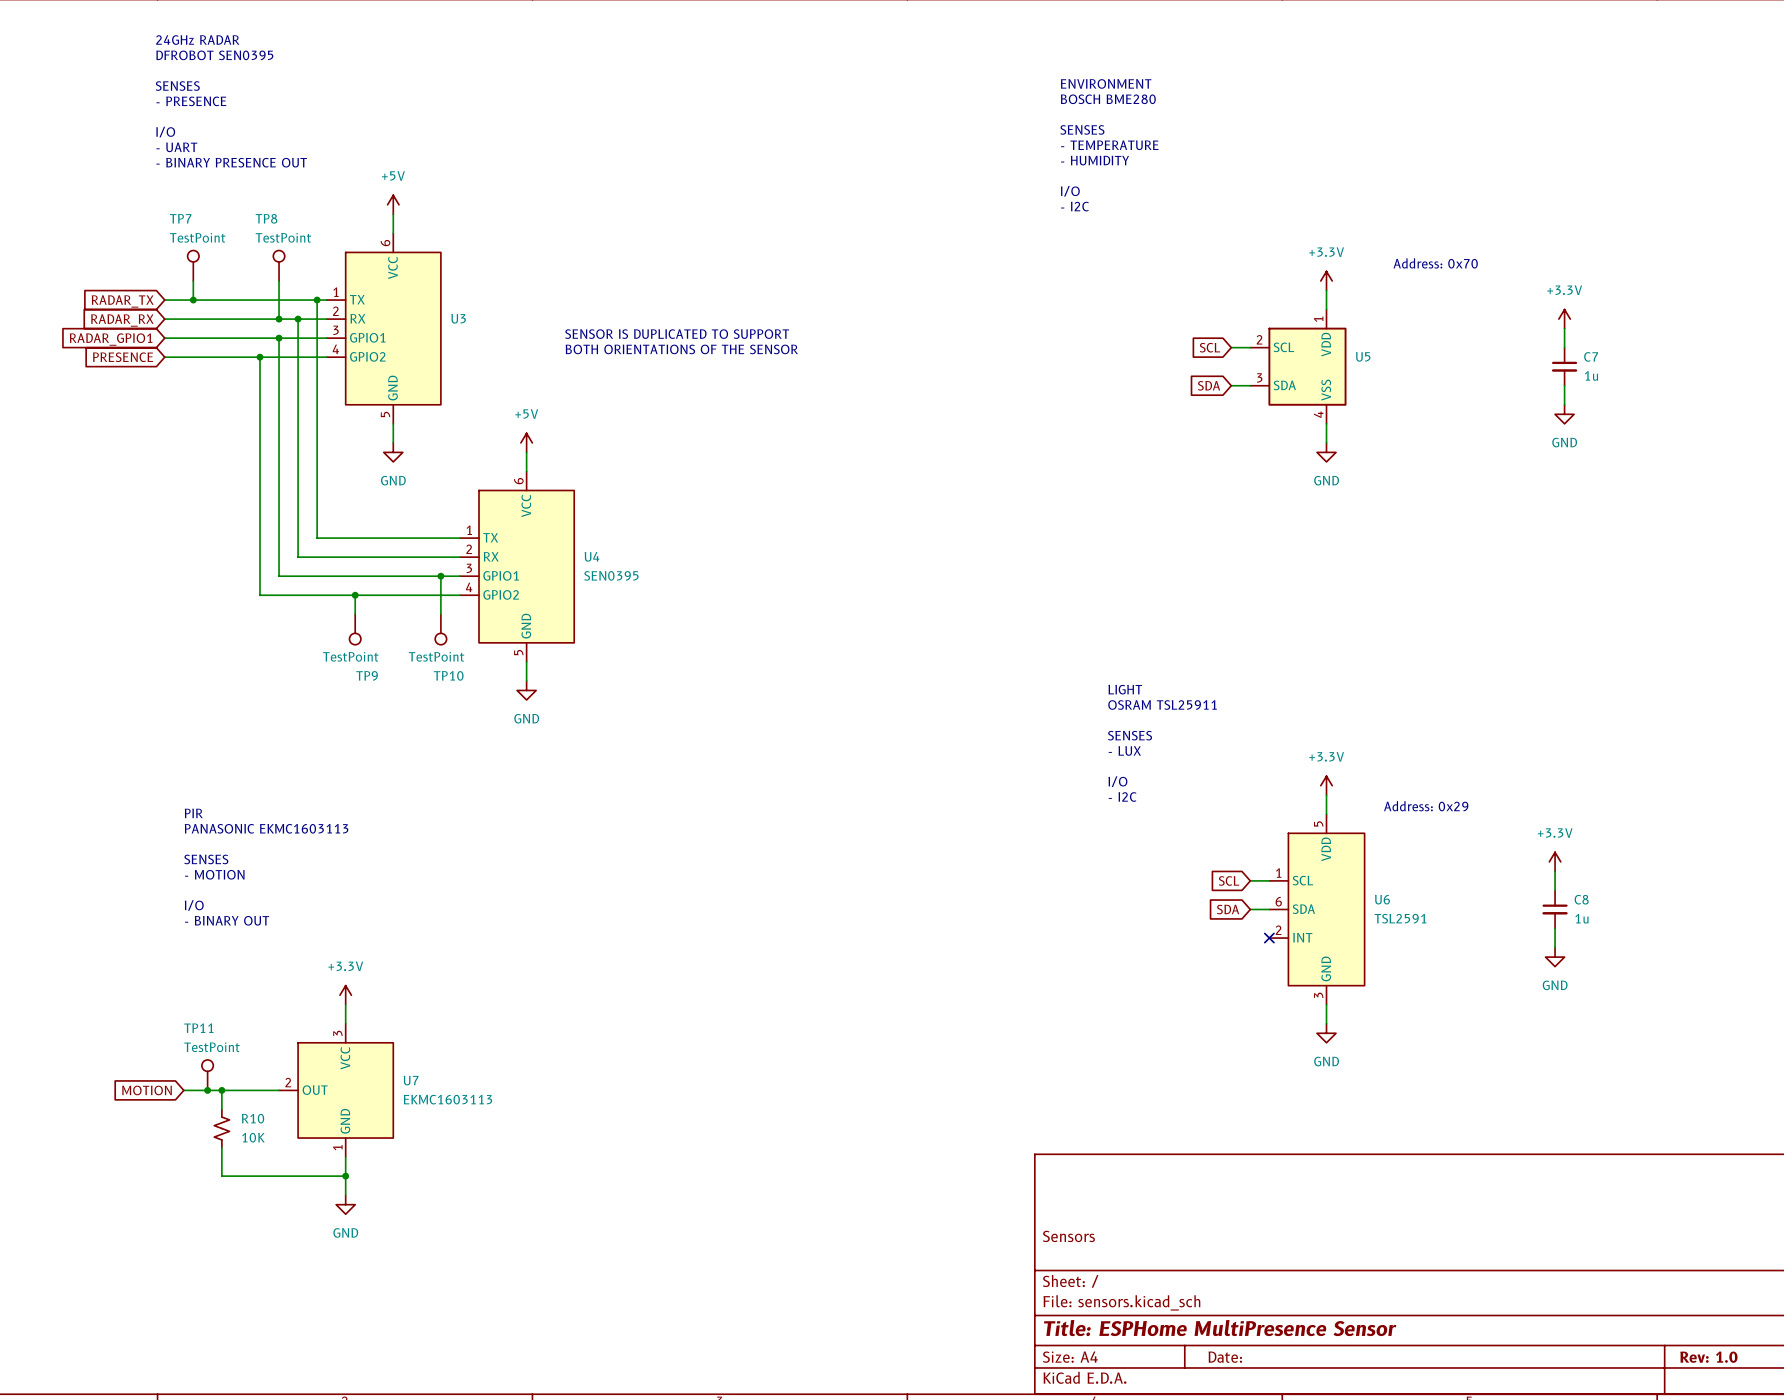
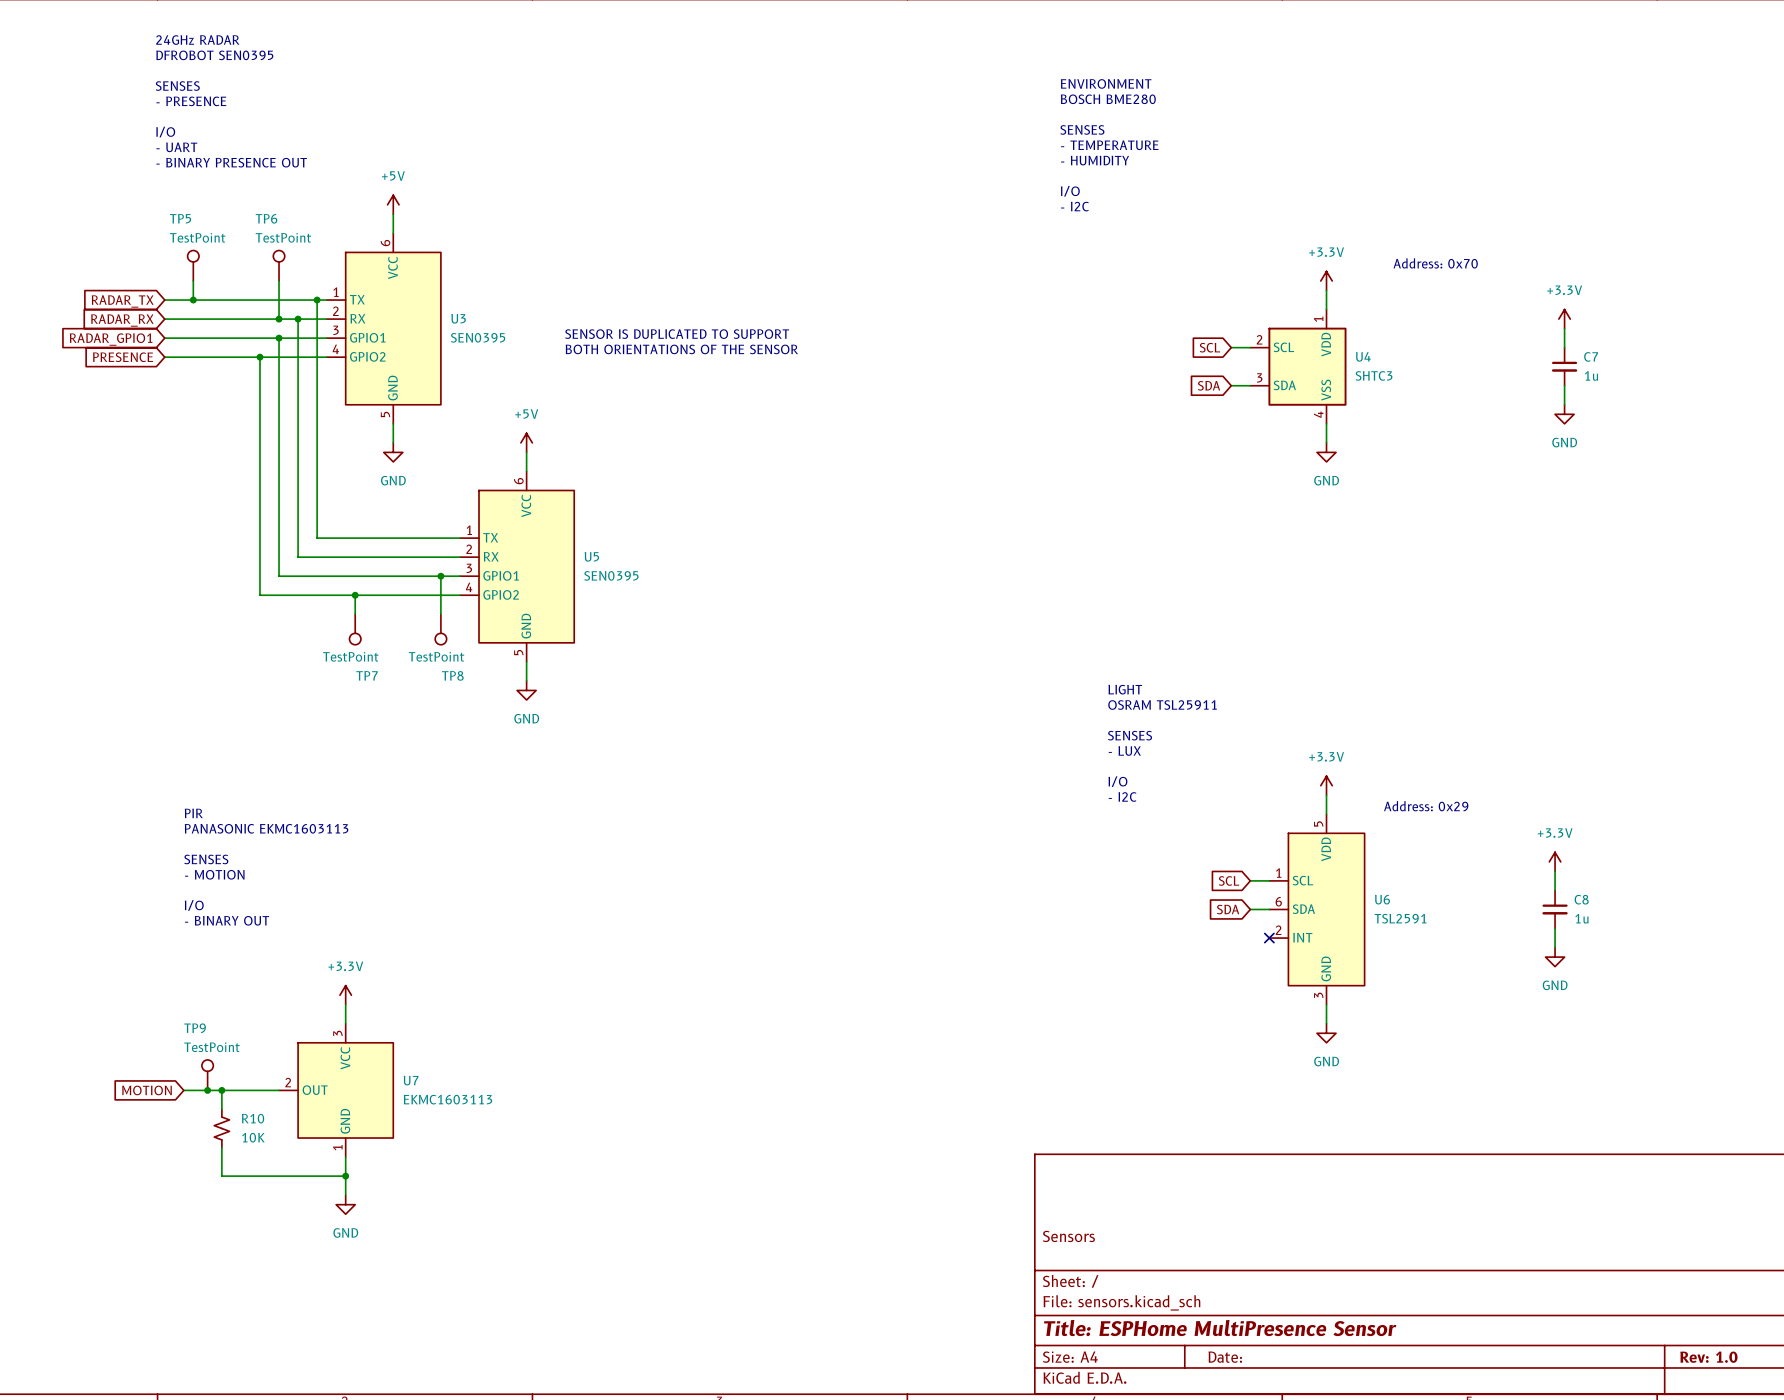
TP7 name: TP7 (180, 218) -> TP5 (180, 218)
TP8 name: TP8 (266, 218) -> TP6 (266, 218)
U3 value: none -> SEN0395 (478, 337)
U5 name: U5 (1363, 356) -> U4 (1363, 356)
U5 value: none -> SHTC3 (1373, 375)
U4 name: U4 (592, 556) -> U5 (591, 556)
TP9 name: TP9 (367, 675) -> TP7 (367, 675)
TP10 name: TP10 (448, 675) -> TP8 (452, 675)
TP11 name: TP11 (198, 1028) -> TP9 (195, 1028)

